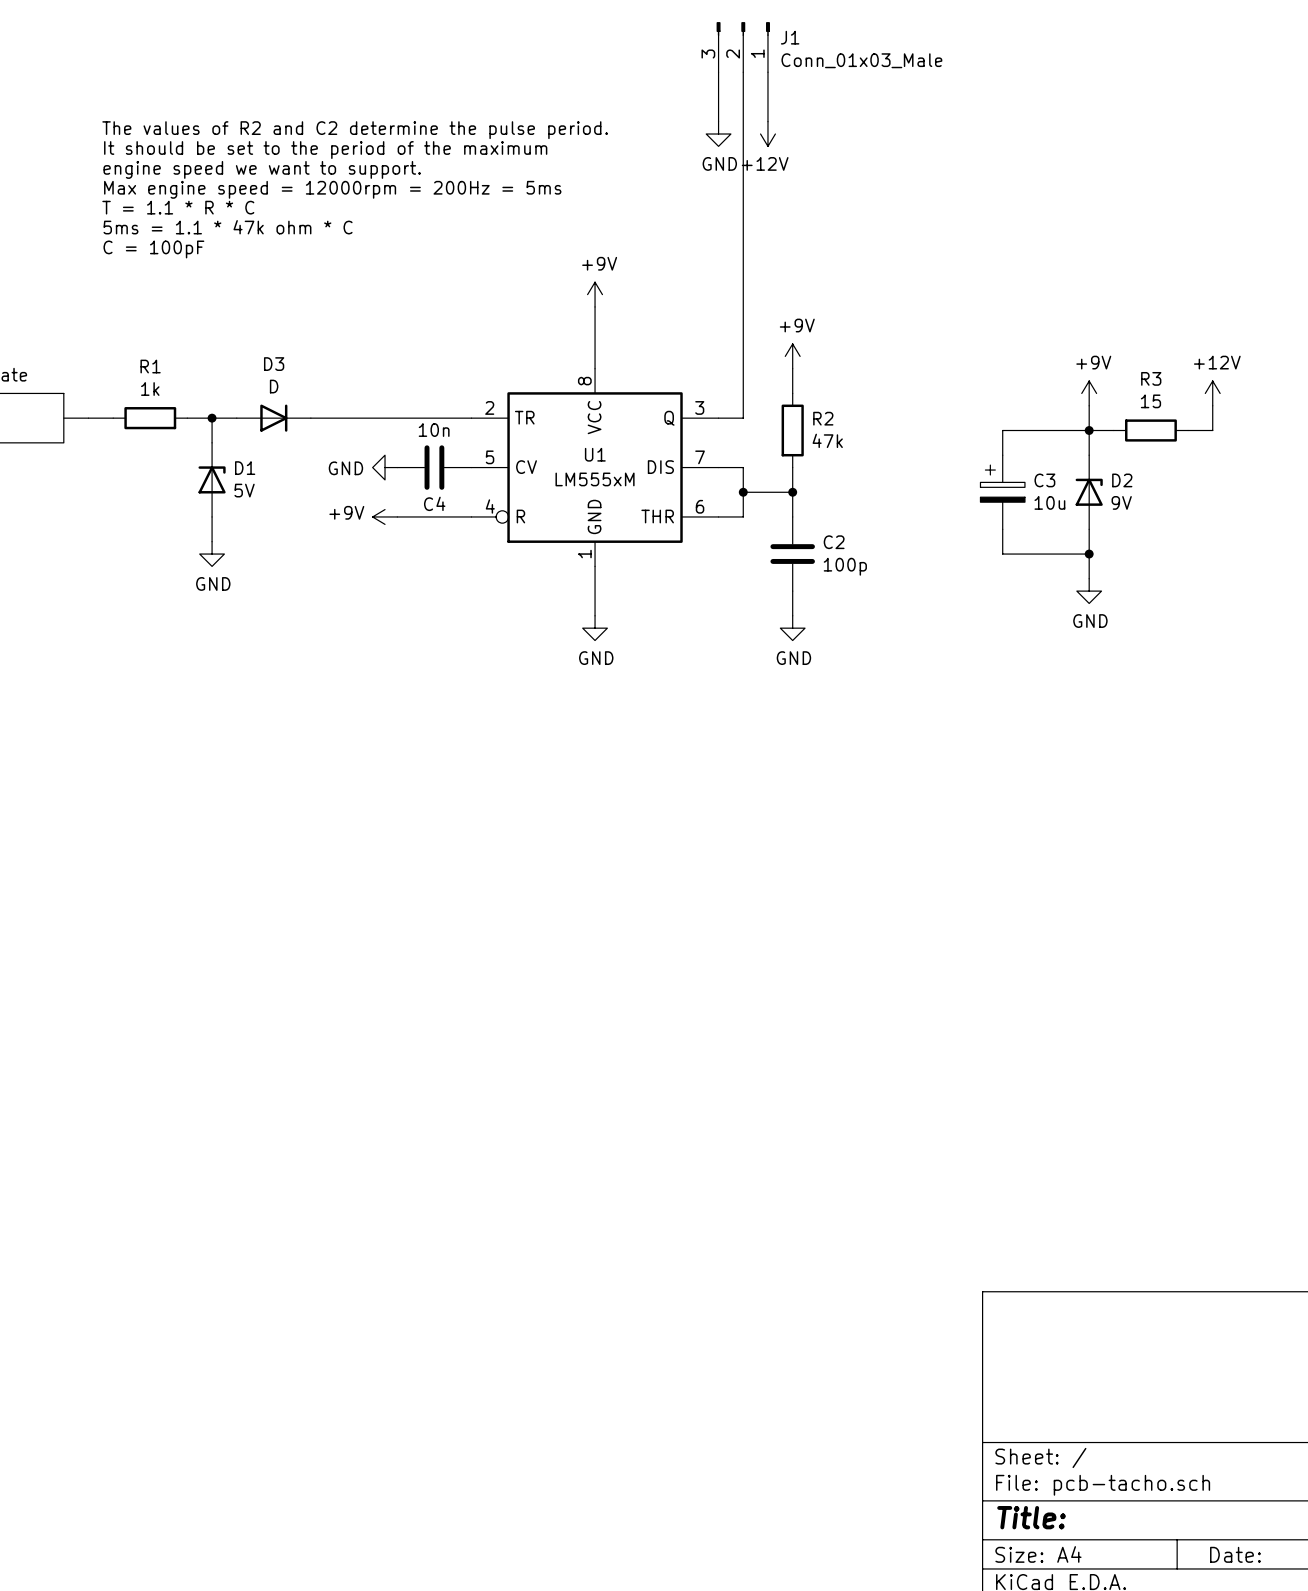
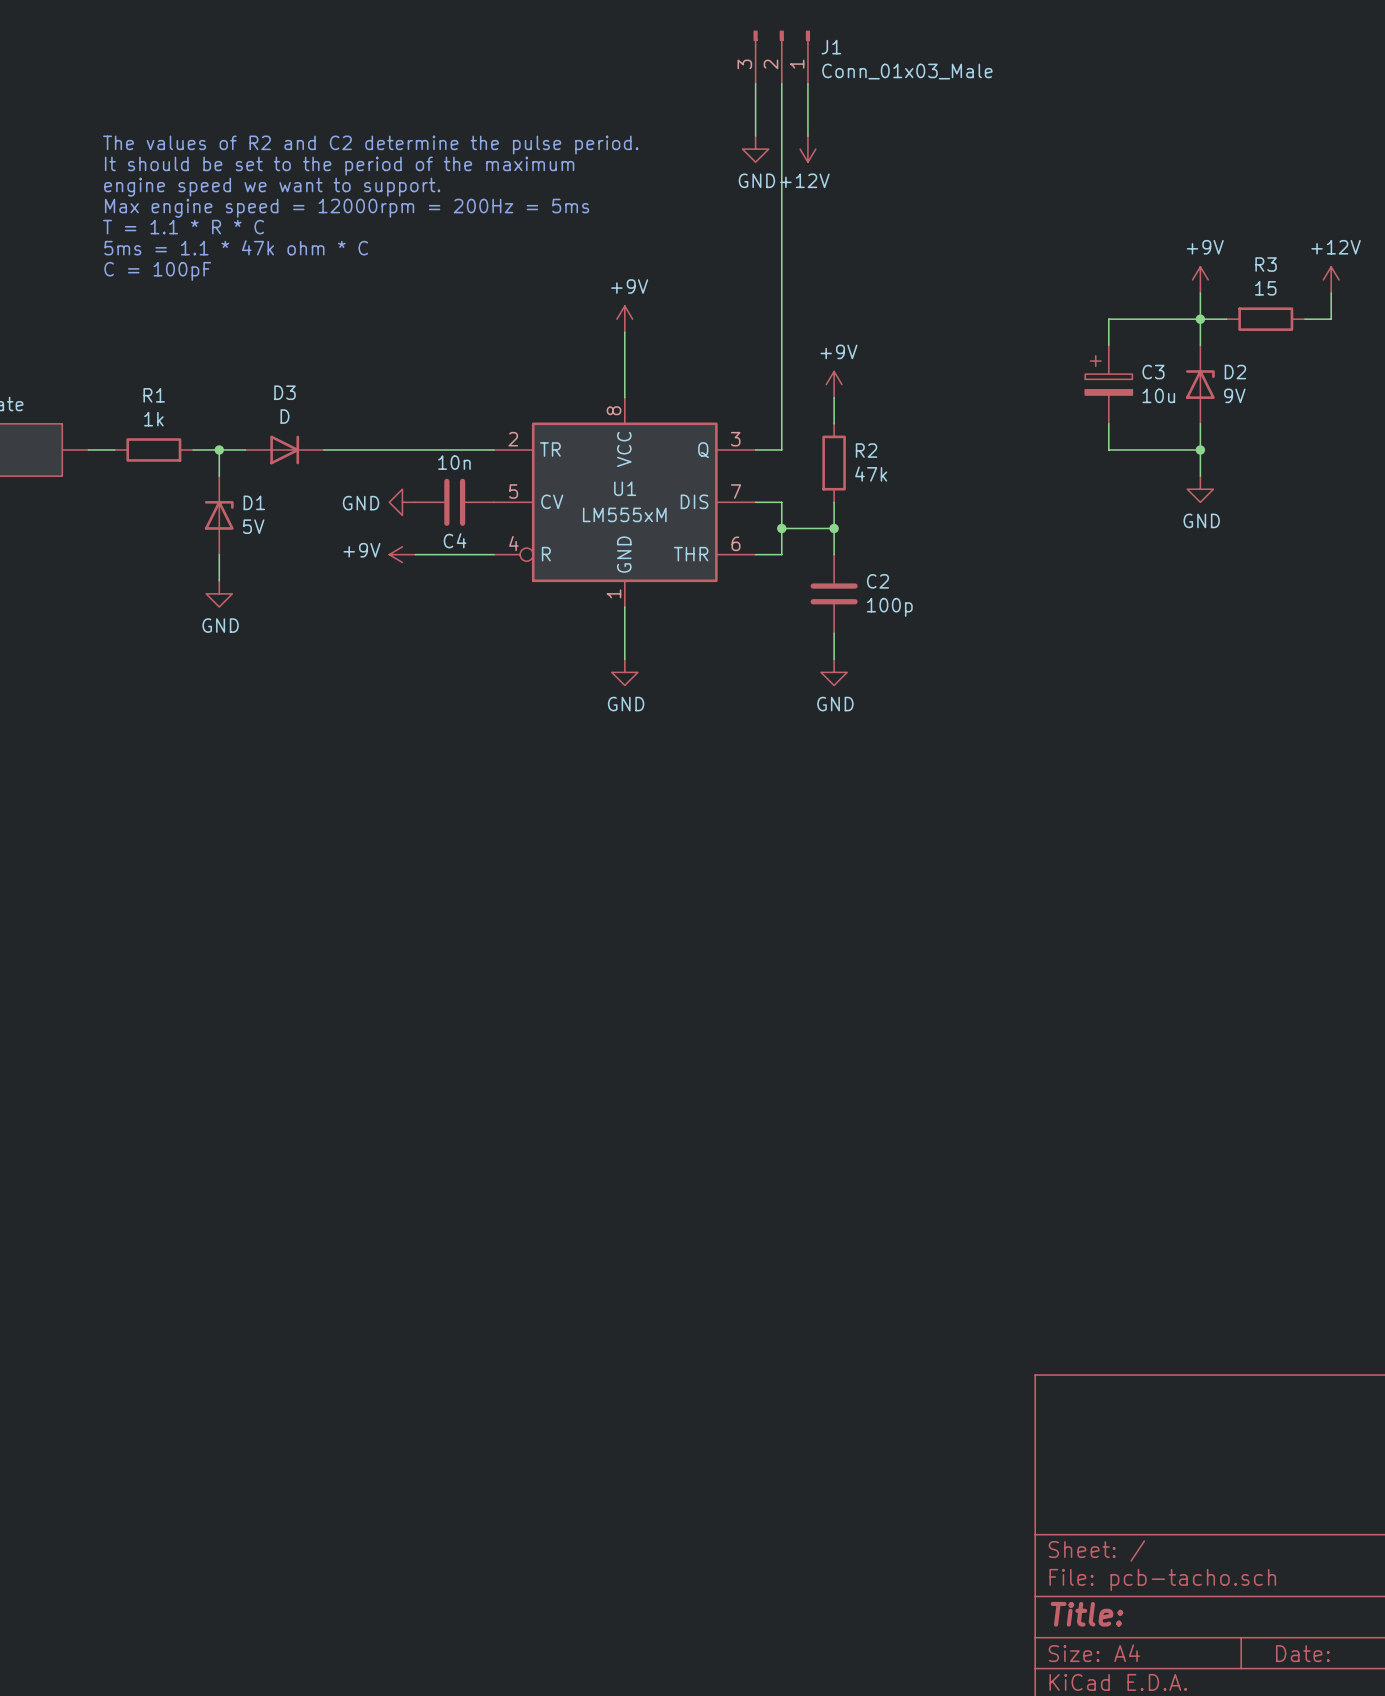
junction: none -> (1200, 319)
power symbol position: +9V (1089, 393) -> +9V (1200, 279)
power symbol position: +12V (1212, 393) -> +12V (1331, 279)
wire: (1089, 405) (1089, 455) -> (1200, 293) (1200, 345)
wire: (1212, 405) (1212, 430) (1188, 430) -> (1331, 293) (1331, 319) (1305, 319)
junction position: (1089, 430) -> (1200, 449)
wire: (1113, 430) (1002, 430) (1002, 455) -> (1226, 319) (1108, 319) (1108, 345)
R3 position: (1150, 430) -> (1265, 319)
C3 position: (1002, 492) -> (1108, 384)
D2 position: (1089, 492) -> (1200, 384)
wire: (1002, 529) (1002, 554) (1089, 554) -> (1108, 423) (1108, 449) (1200, 449)
wire: (1089, 529) (1089, 578) -> (1200, 423) (1200, 476)
junction: (1089, 554) -> none
power symbol position: GND (1089, 591) -> GND (1200, 489)

